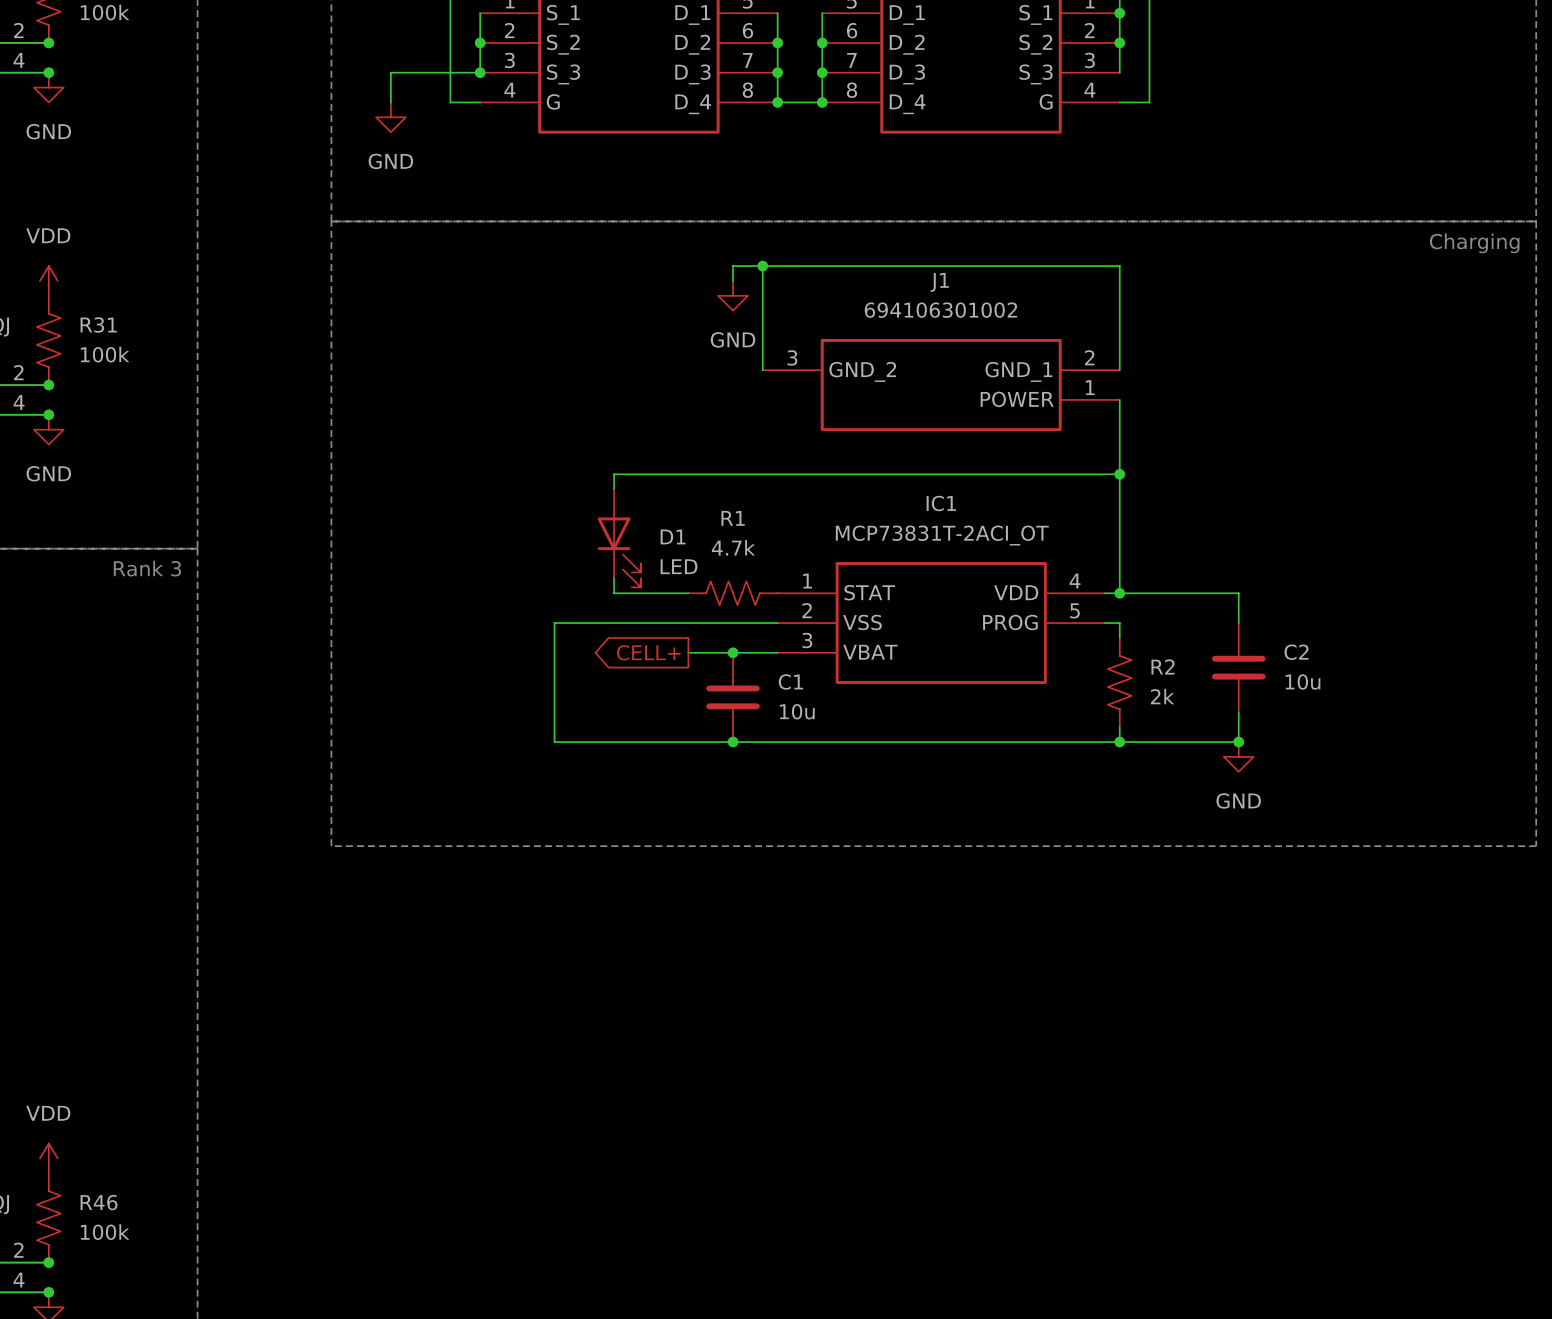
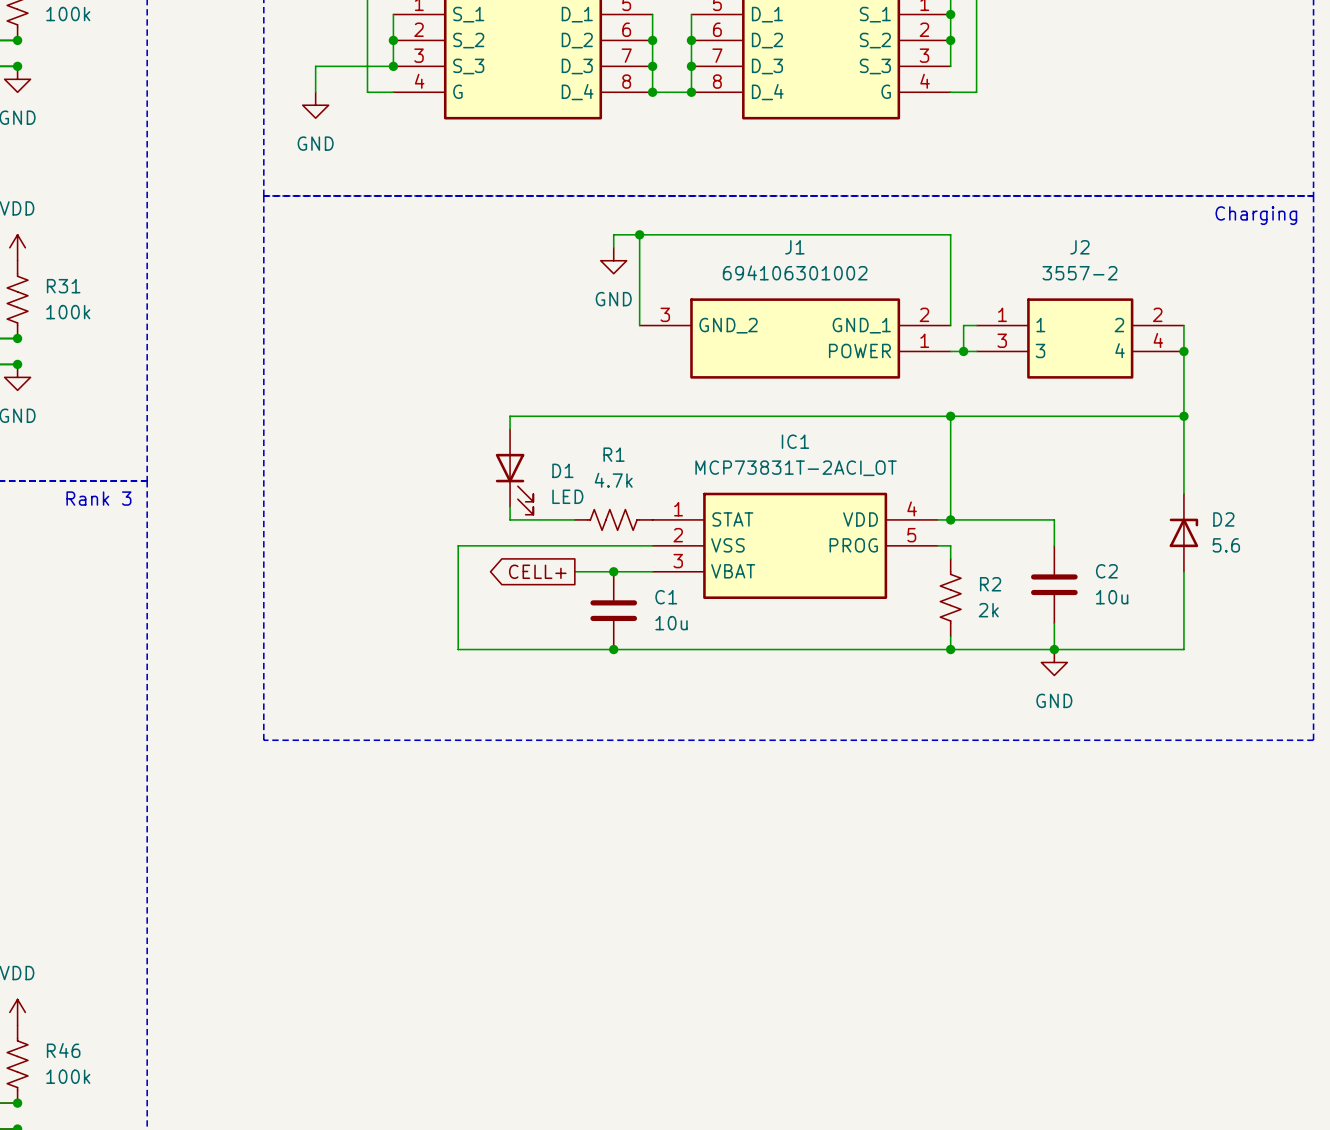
wire: none -> (976, 325) (963, 325) (963, 351)
wire: none -> (1183, 325) (1183, 494)
J2: none -> 3557-2 (1080, 338)
wire: (1119, 399) (1119, 474) -> (950, 351) (976, 351)
junction: none -> (963, 351)
junction: none -> (1183, 351)
wire: none -> (950, 416) (1183, 416)
junction: none -> (1183, 416)
D2: none -> 5.6 (1183, 532)
wire: none -> (1183, 571) (1183, 649) (1054, 649)

